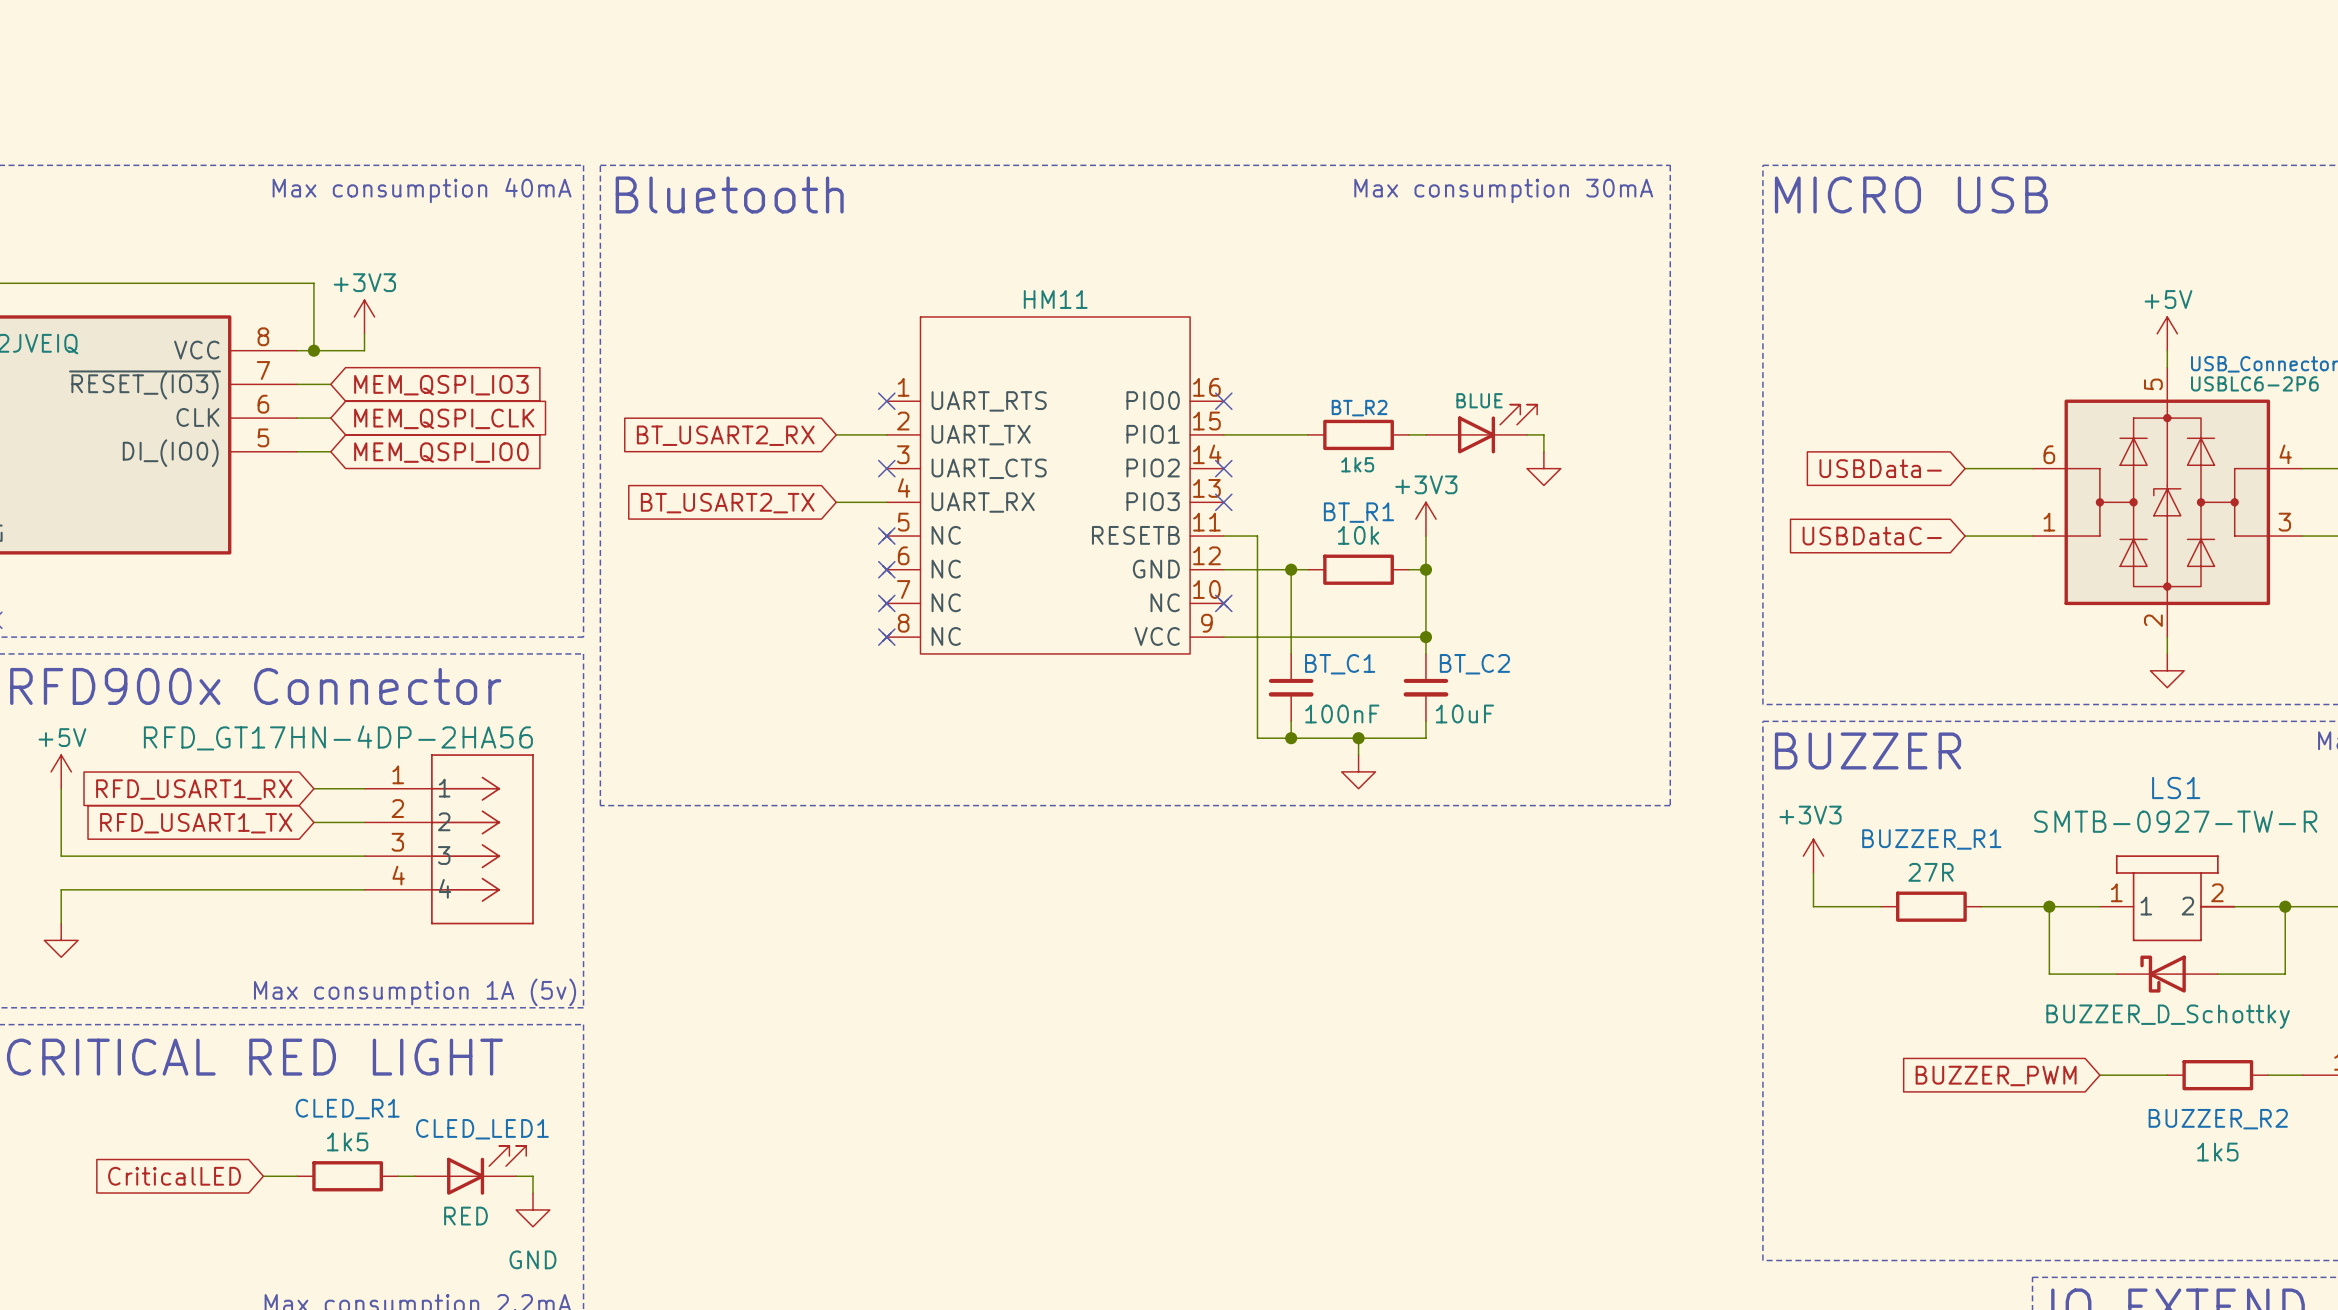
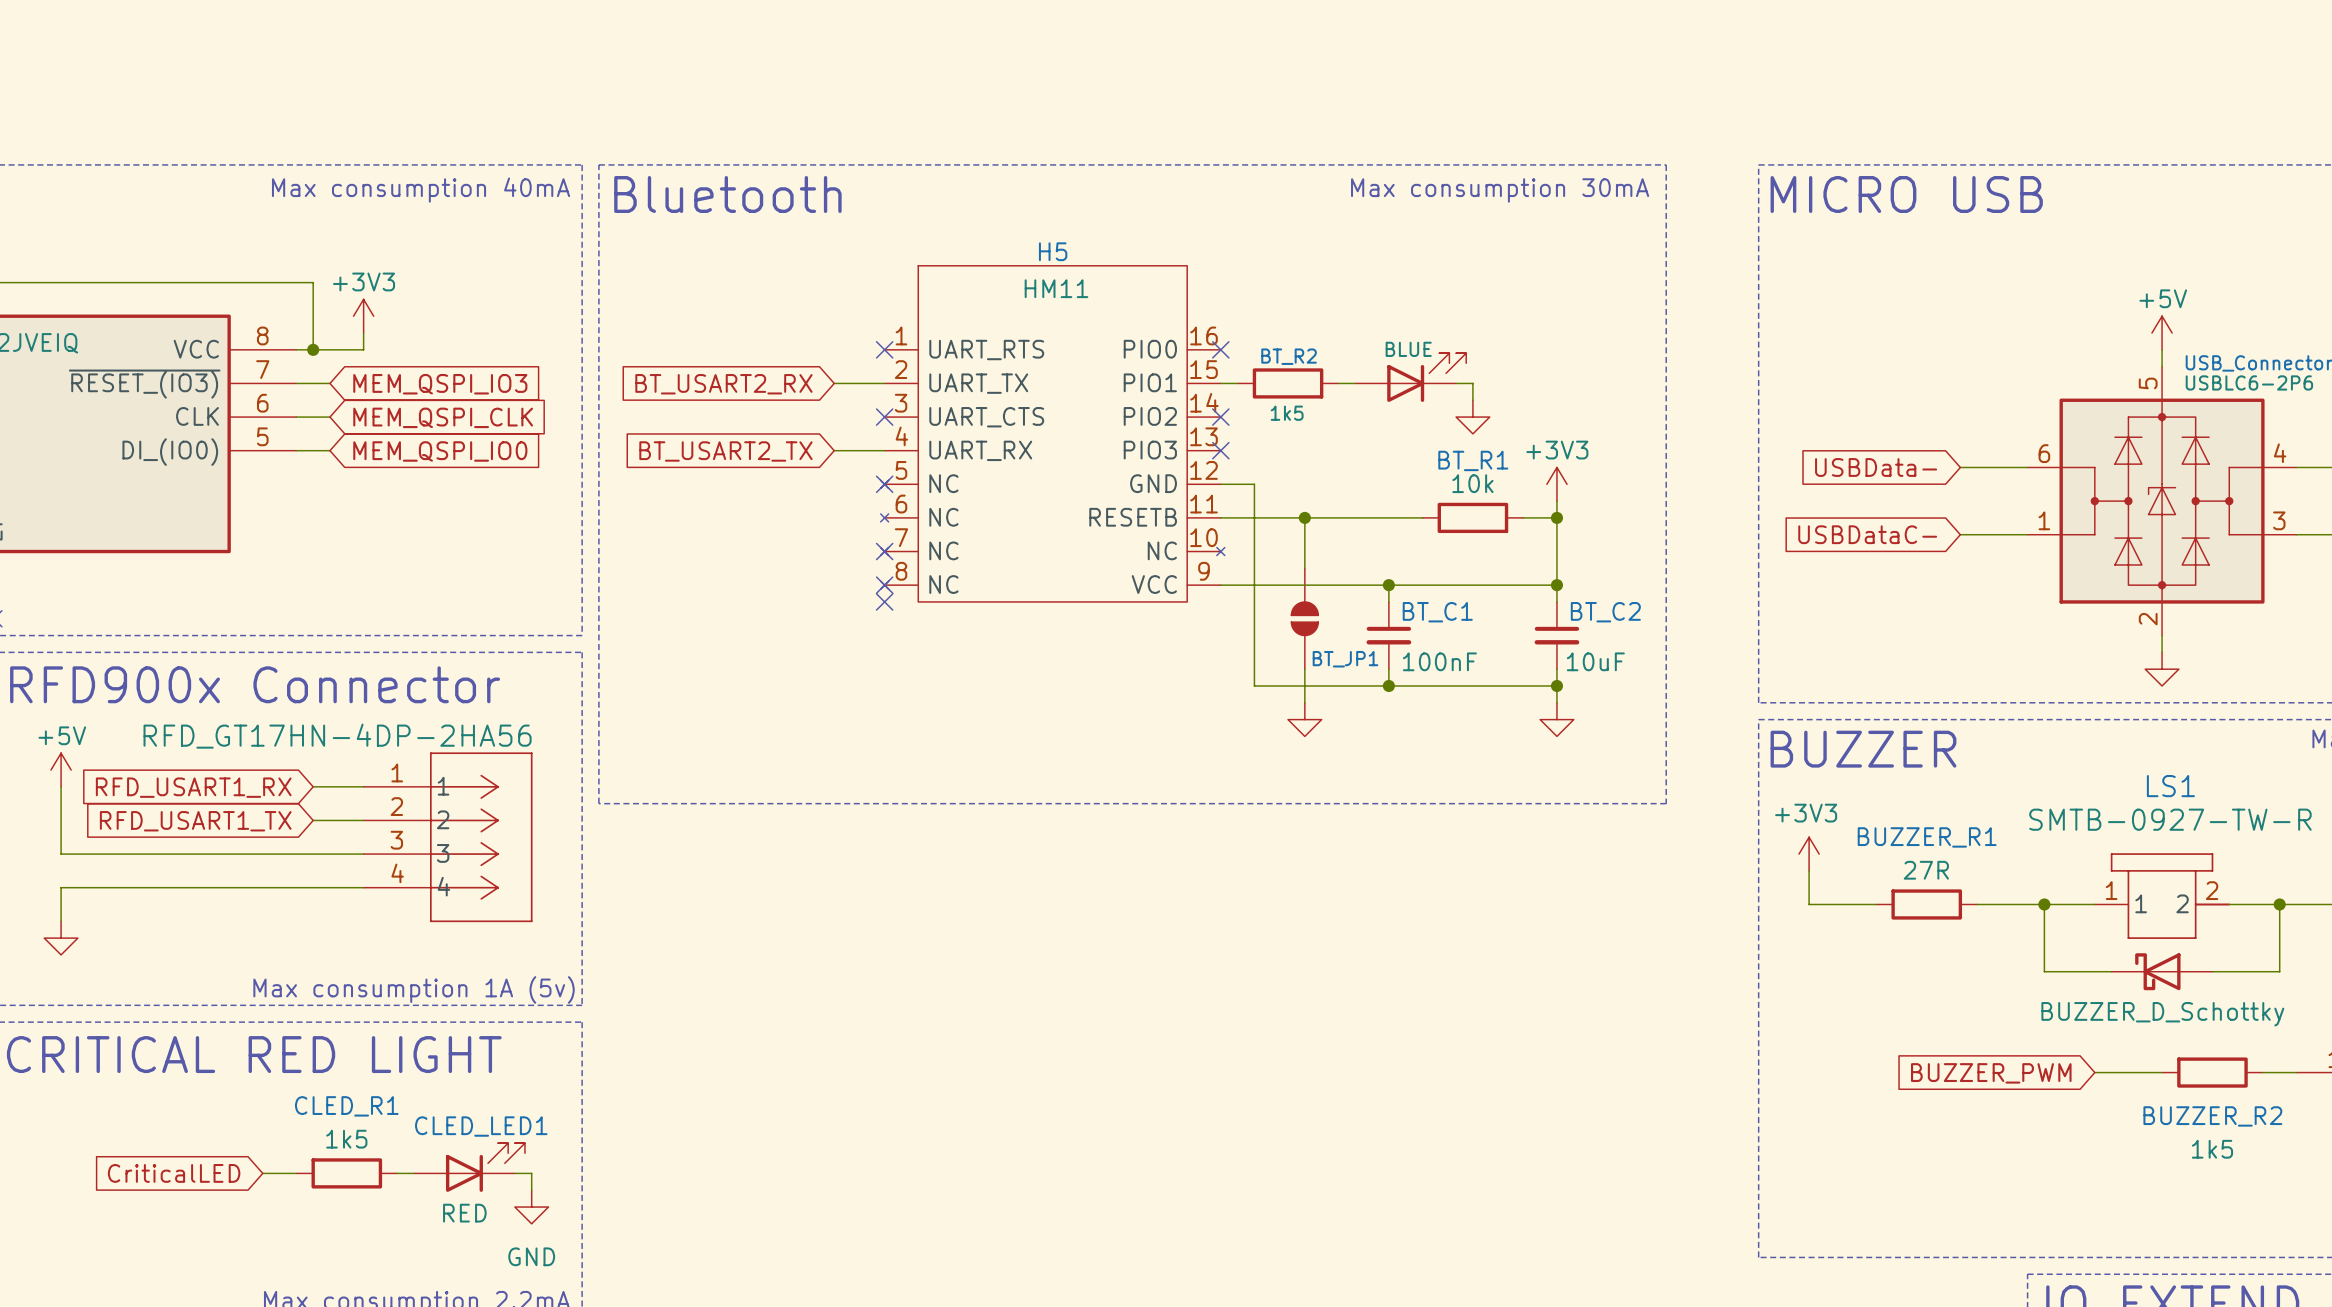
no-connect mark: none -> (884, 349)
no-connect mark: none -> (1220, 349)
no-connect mark position: (886, 401) -> (884, 417)
no-connect mark position: (1223, 401) -> (1220, 417)
part position: (1481, 429) -> (1410, 377)
wire: (836, 434) (886, 434) -> (834, 383) (884, 383)
H5: none -> HM11 (1052, 433)
wire: (1223, 434) (1308, 434) -> none
BT_R2 position: (1358, 434) -> (1288, 383)
wire: (1409, 434) (1425, 434) -> (1338, 383) (1355, 383)
wire: (1527, 434) (1543, 434) (1543, 451) -> (1456, 383) (1472, 383) (1472, 400)
global label position: BT_USART2_RX (725, 435) -> BT_USART2_RX (723, 384)
no-connect mark position: (886, 468) -> (884, 484)
no-connect mark position: (1223, 468) -> (1220, 450)
power symbol position: (1543, 468) -> (1472, 417)
part: HM11 (1055, 485) -> none
wire: (836, 502) (886, 502) -> (834, 450) (884, 450)
no-connect mark: (1223, 502) -> none
wire: none -> (1556, 501) (1556, 601)
global label position: BT_USART2_TX (727, 503) -> BT_USART2_TX (725, 451)
junction: none -> (1304, 517)
power symbol position: +3V3 (1425, 519) -> +3V3 (1556, 484)
wire: none -> (1523, 517) (1556, 517)
junction: none -> (1556, 517)
no-connect mark: (886, 536) -> none
wire: (1223, 536) (1257, 536) -> (1220, 484) (1254, 484) (1254, 534)
wire: (1425, 536) (1425, 653) -> none
no-connect mark: none -> (884, 551)
no-connect mark: (886, 569) -> none
wire: (1223, 569) (1308, 569) -> (1304, 517) (1304, 568)
wire: (1291, 569) (1291, 653) -> none
junction: (1291, 569) -> none
BT_R1 position: (1358, 569) -> (1472, 517)
wire: (1409, 569) (1425, 569) -> (1220, 383) (1237, 383)
junction: (1425, 569) -> none
no-connect mark: none -> (884, 585)
wire: none -> (1220, 585) (1556, 585)
junction: none -> (1388, 585)
junction: none -> (1556, 585)
no-connect mark: (1223, 603) -> none
BT_JP1: none -> (1304, 618)
no-connect mark: (886, 637) -> none
wire: (1223, 637) (1425, 637) -> (1220, 517) (1422, 517)
junction: (1425, 637) -> none
wire: none -> (1304, 669) (1304, 702)
wire: none -> (1556, 669) (1556, 702)
wire: (1257, 687) (1257, 738) (1425, 738) (1425, 721) -> (1254, 685) (1556, 685)
BT_C1 position: (1291, 687) -> (1388, 635)
junction: none -> (1388, 685)
BT_C2 position: (1425, 687) -> (1556, 635)
junction: none -> (1556, 685)
wire: (1291, 721) (1291, 738) -> (1388, 585) (1388, 601)
power symbol: none -> (1556, 719)
junction: (1291, 738) -> none
wire: (1358, 738) (1358, 755) -> (1388, 669) (1388, 685)
junction: (1358, 738) -> none
power symbol position: (1358, 771) -> (1304, 719)

